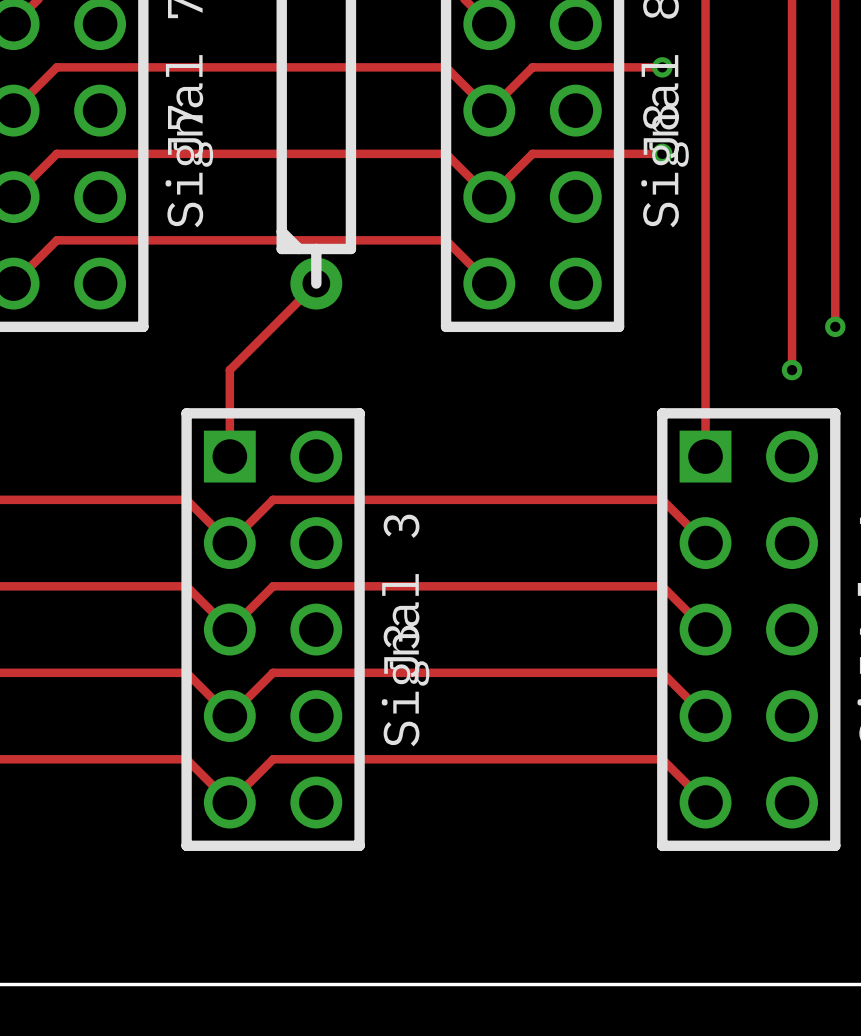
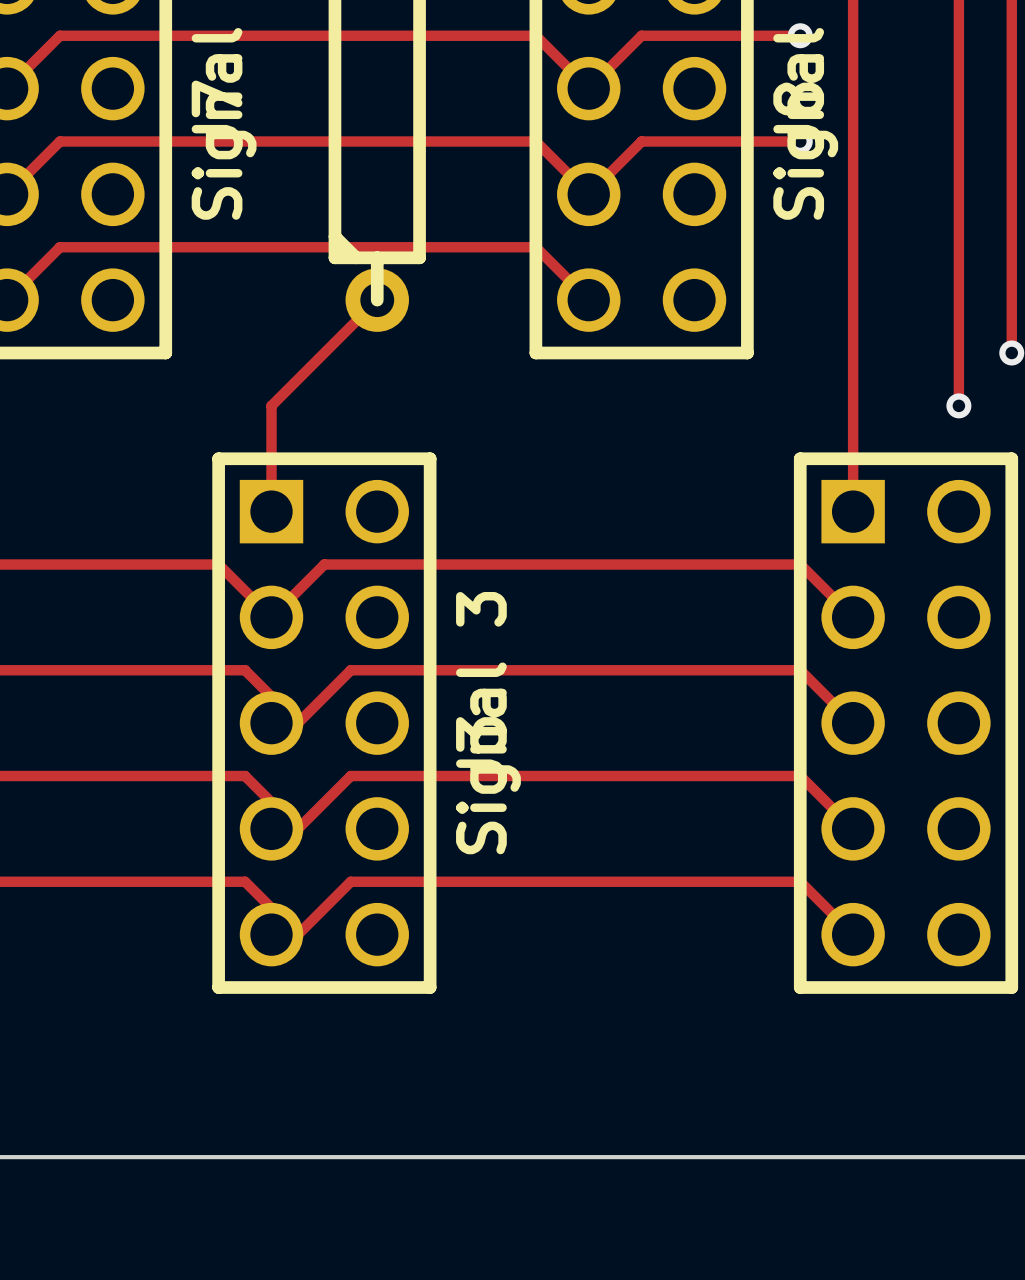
track: (186, 586) (229, 629) (273, 586) (294, 586) -> (218, 670) (245, 670) (297, 723) (350, 670)
track: (186, 672) (229, 716) (273, 672) (294, 672) -> (218, 776) (245, 776) (297, 828) (350, 776)
track: (186, 759) (229, 802) (273, 759) (294, 759) -> (218, 881) (245, 881) (297, 934) (350, 881)

